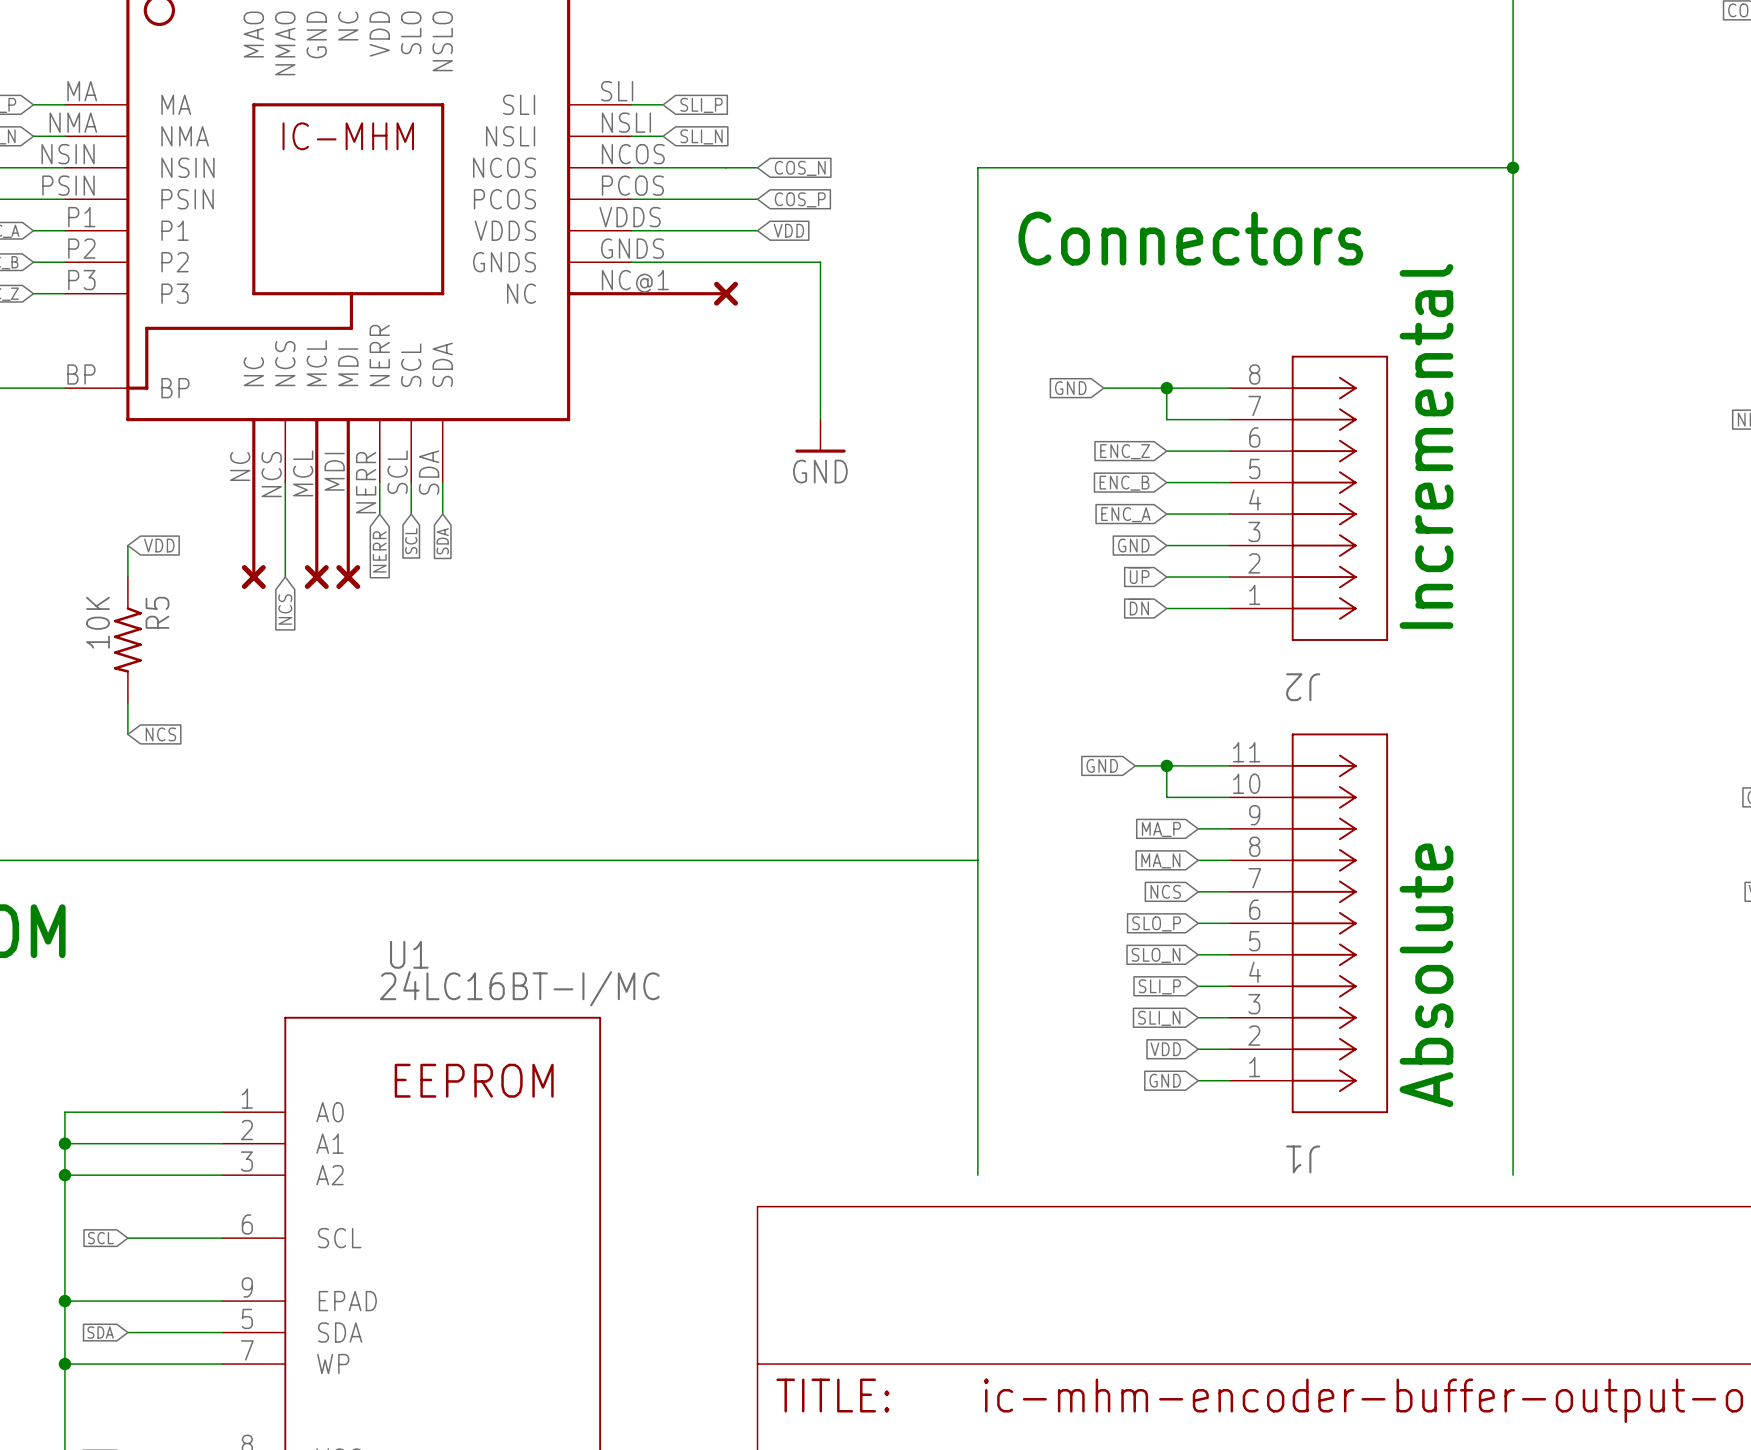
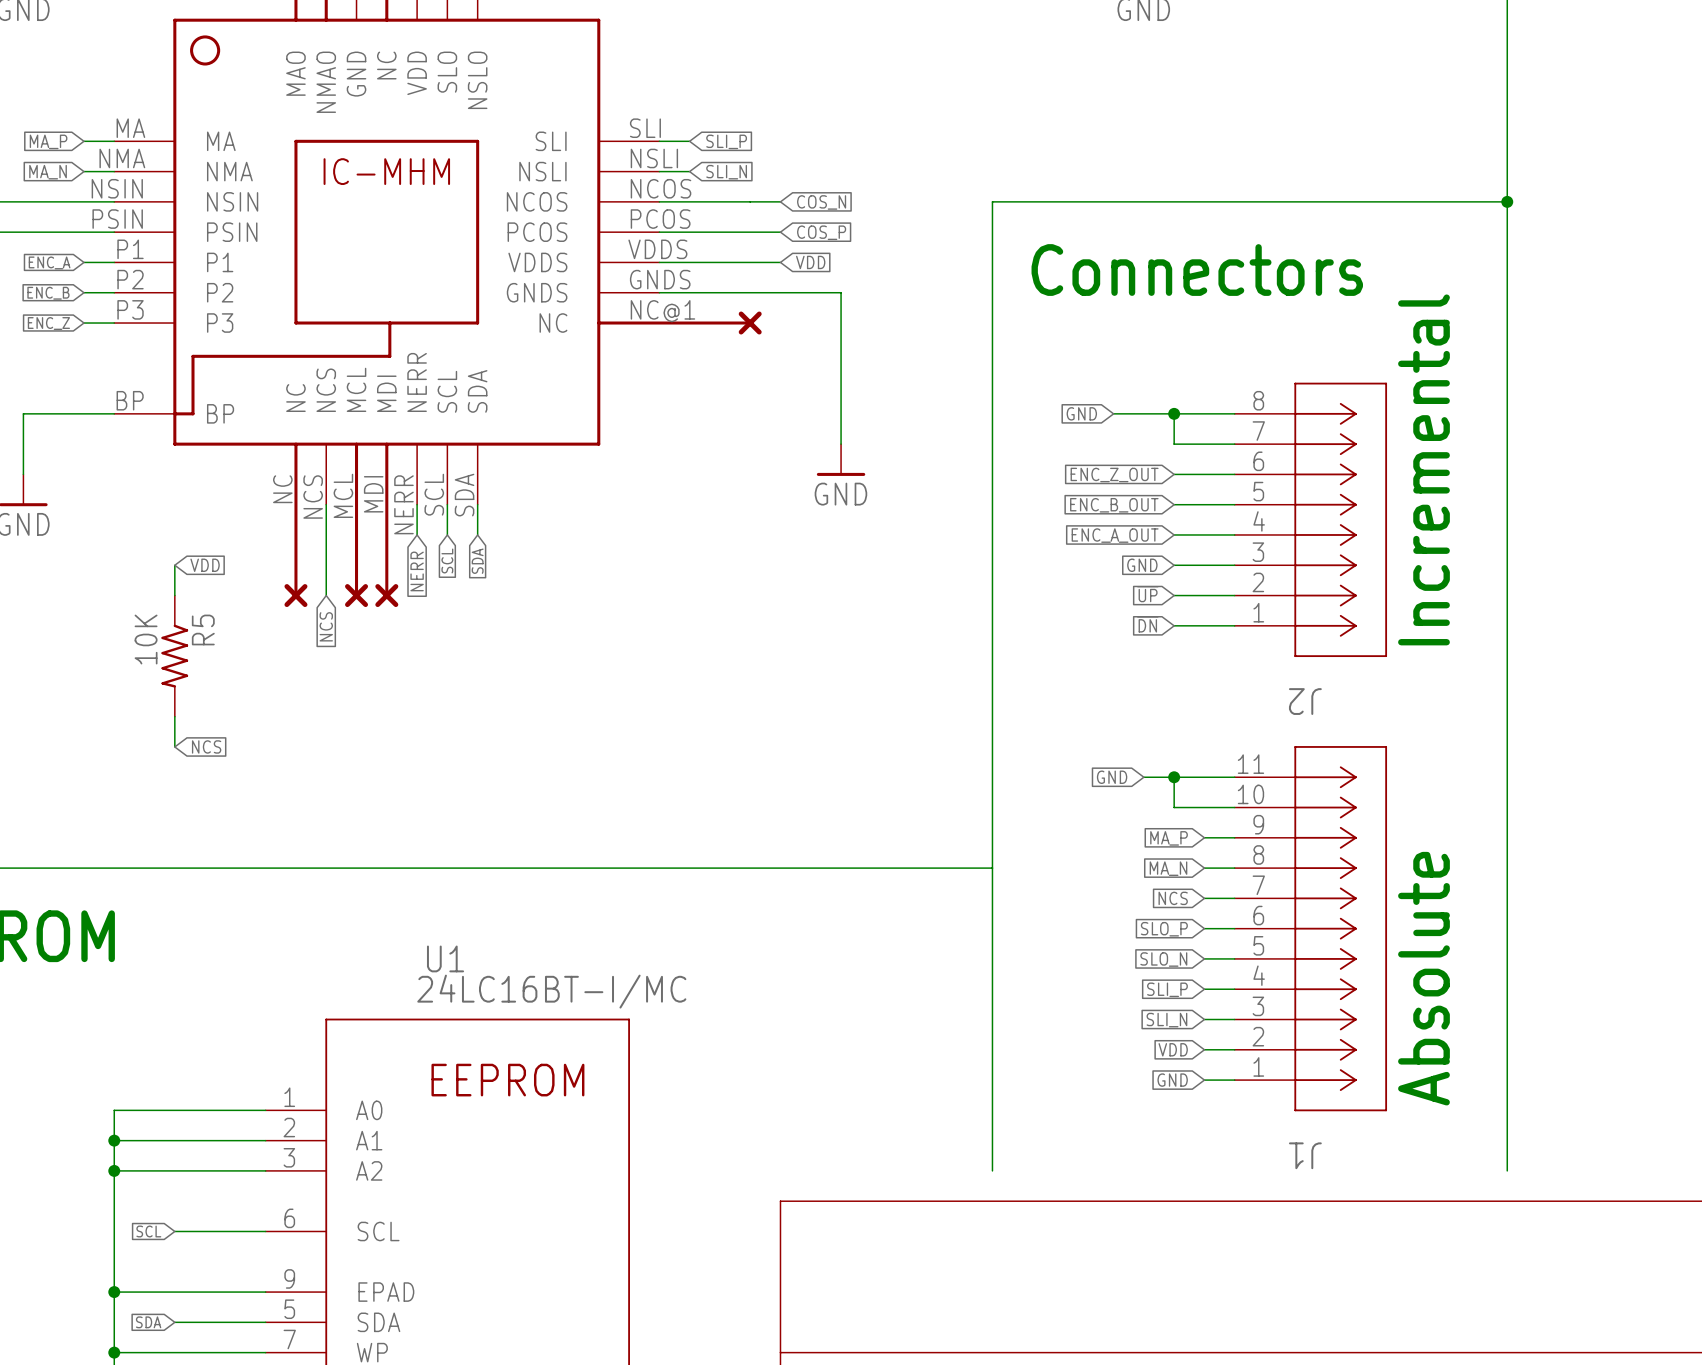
global label: ENC_Z (1125, 451) -> ENC_Z_OUT (1114, 475)
global label: ENC_B (1124, 483) -> ENC_B_OUT (1114, 505)
global label: ENC_A (1125, 514) -> ENC_A_OUT (1115, 535)

